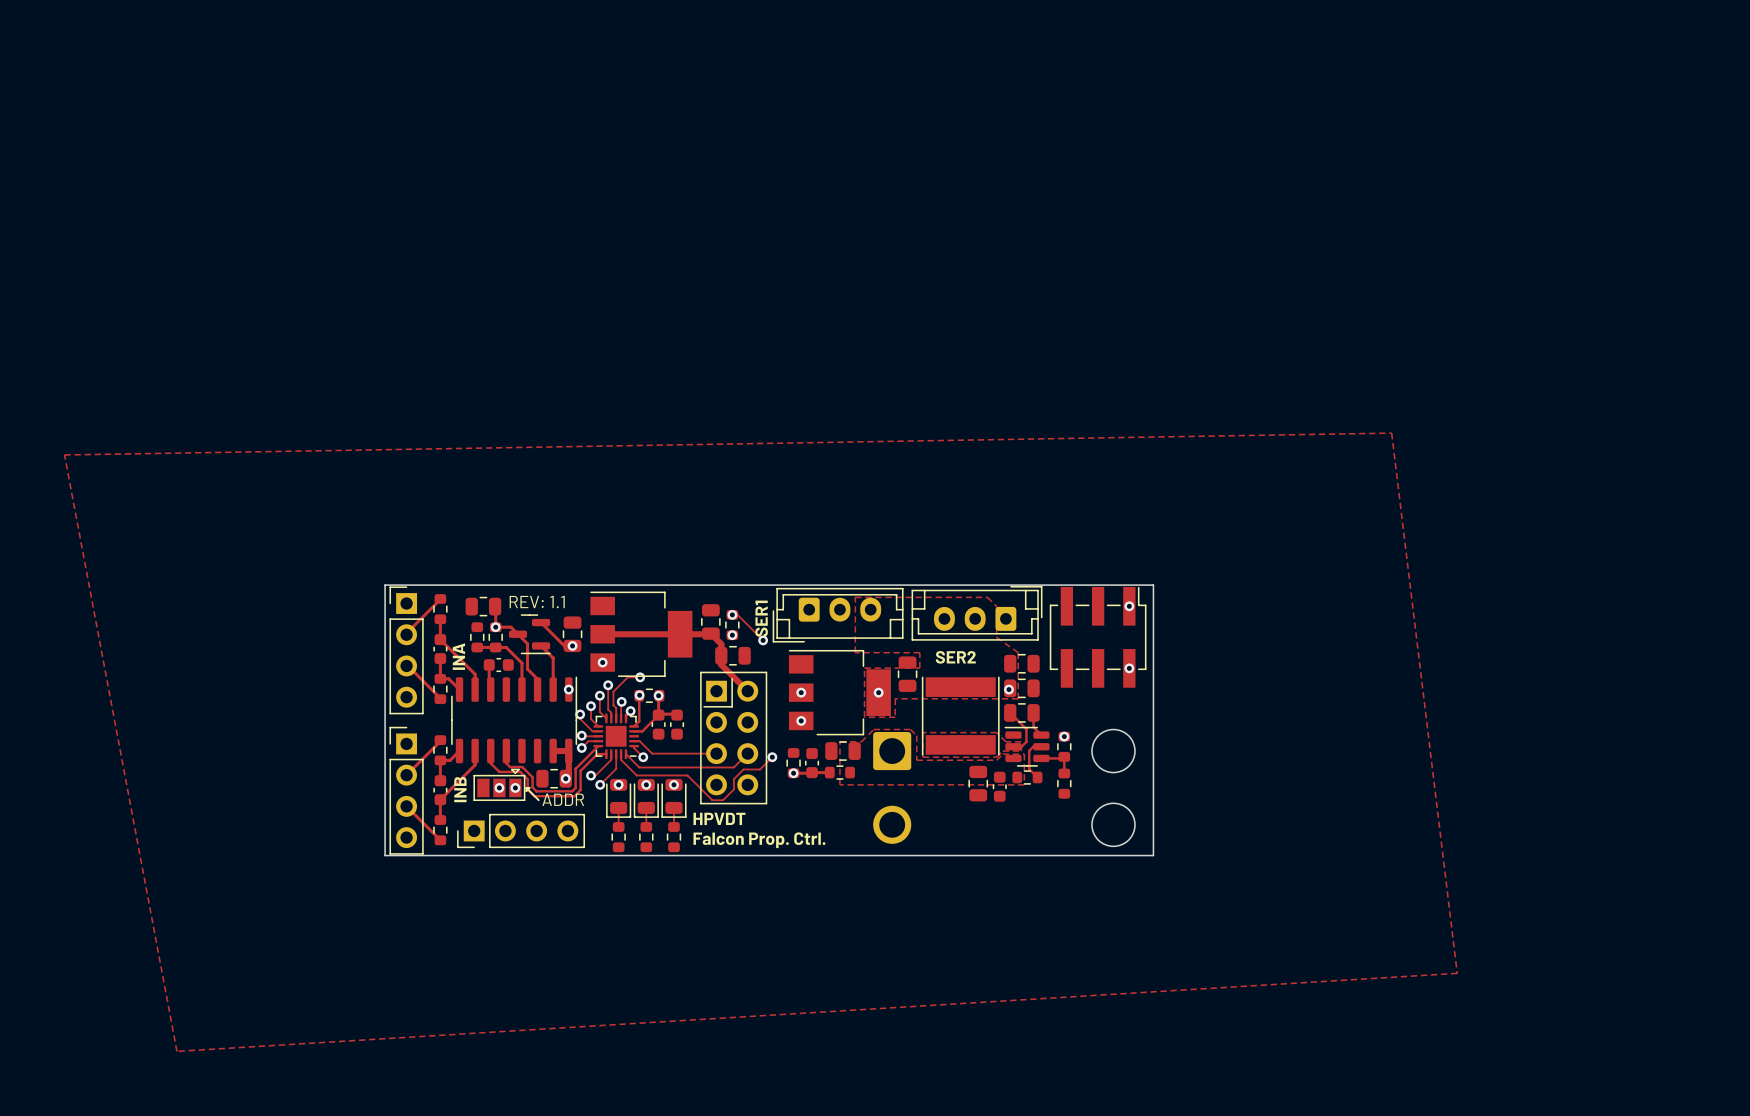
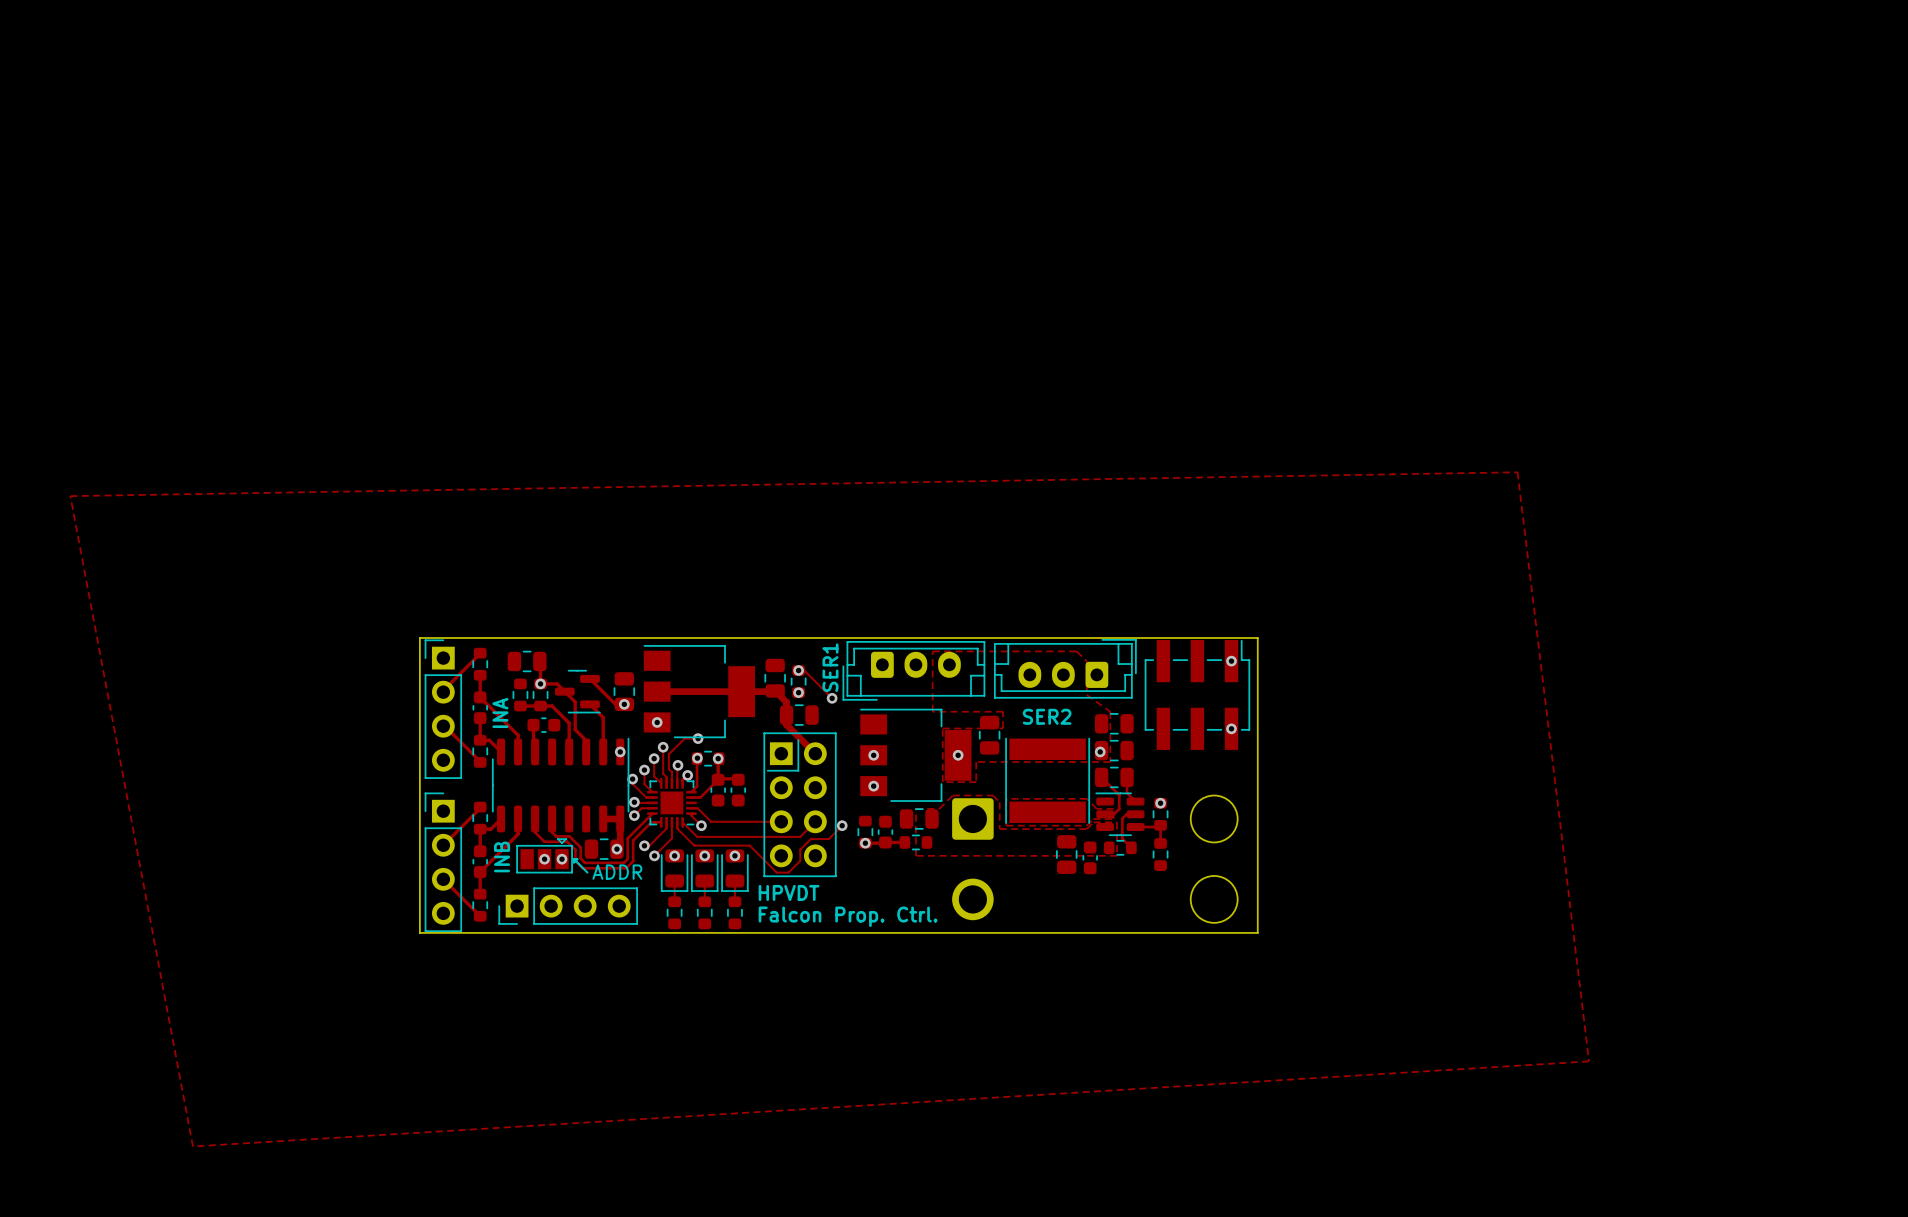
text: REV: 1.1 (537, 602) -> none

